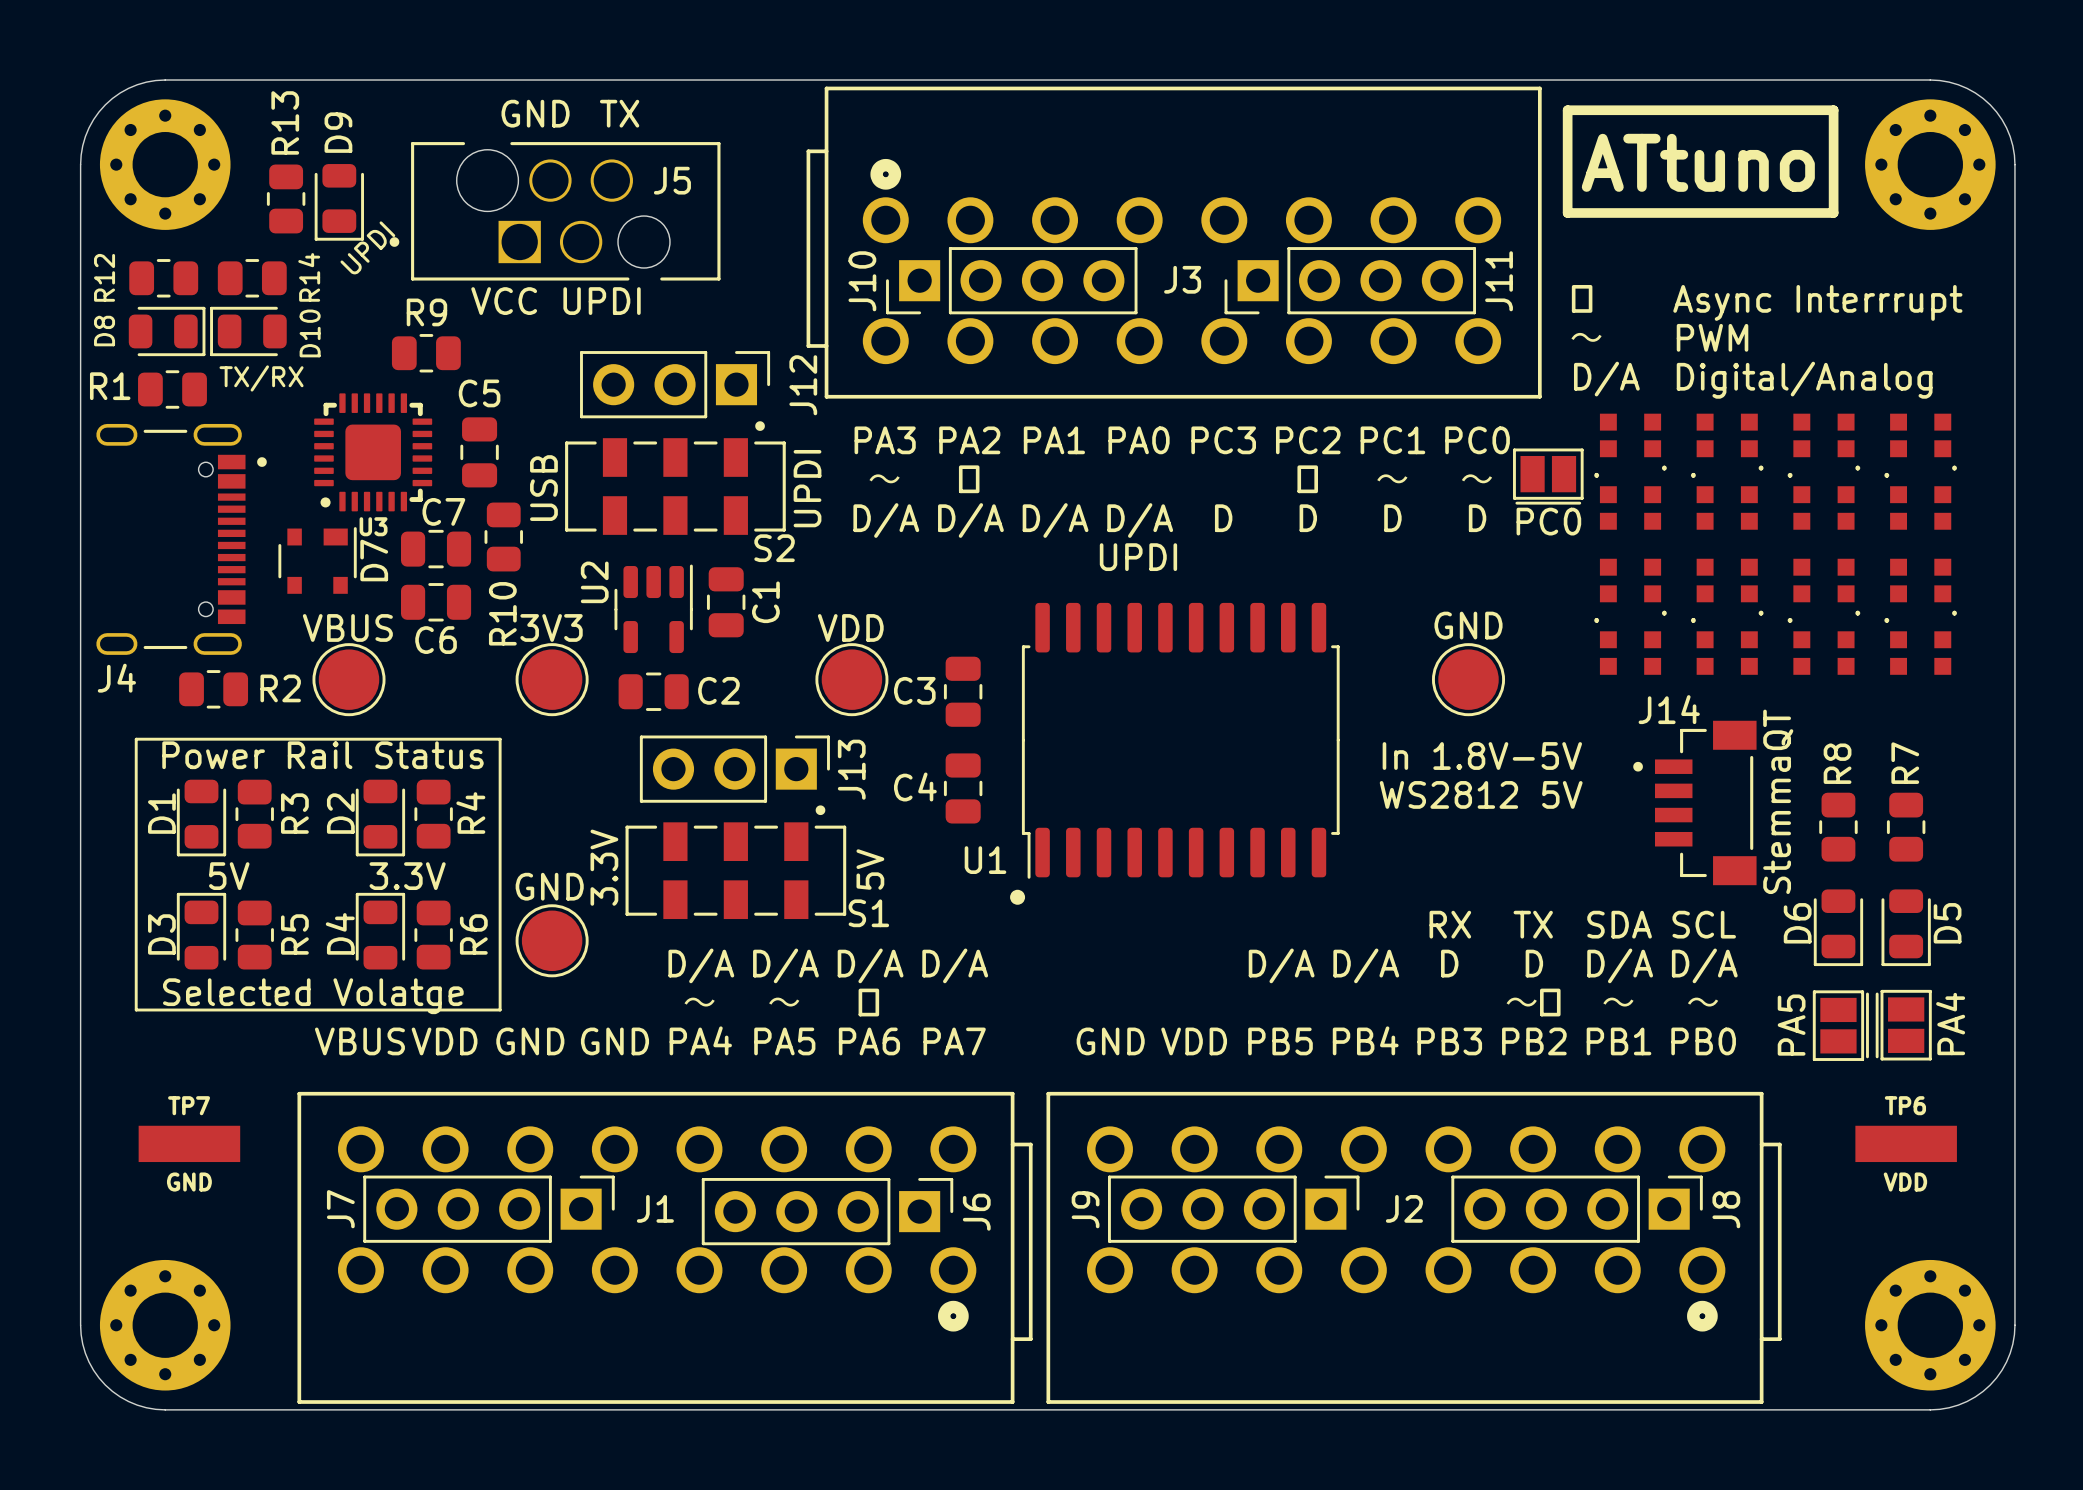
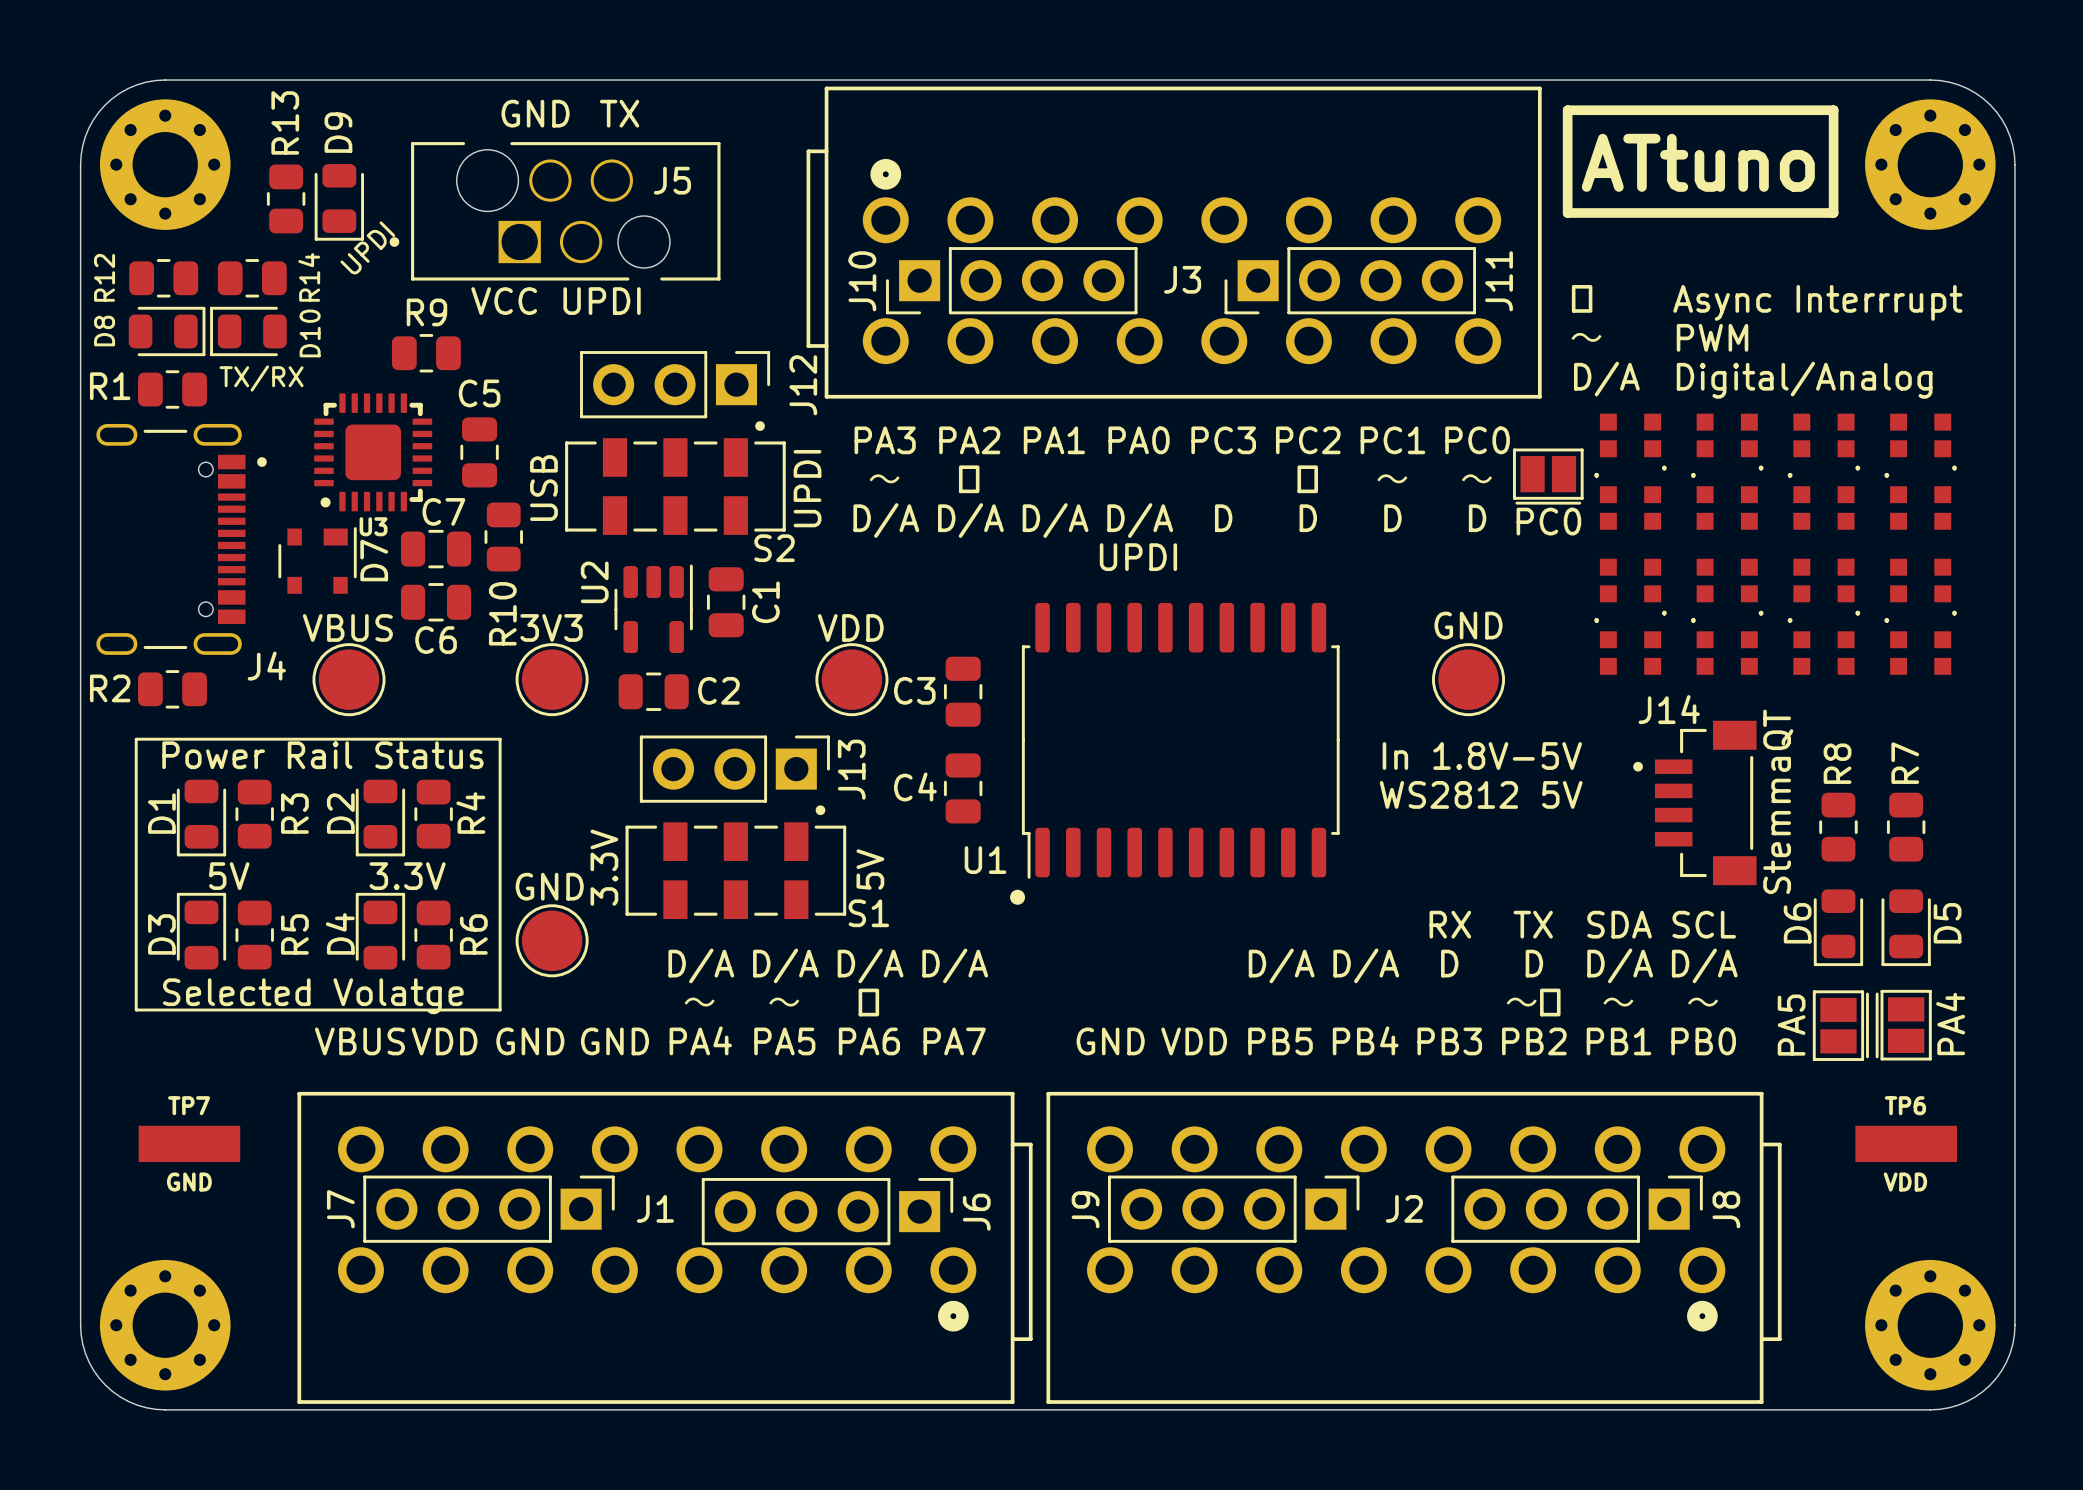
J4 name position: J4 (116, 678) -> J4 (266, 666)
R2 name position: R2 (280, 688) -> R2 (110, 688)
R2 position: (213, 689) -> (172, 689)

